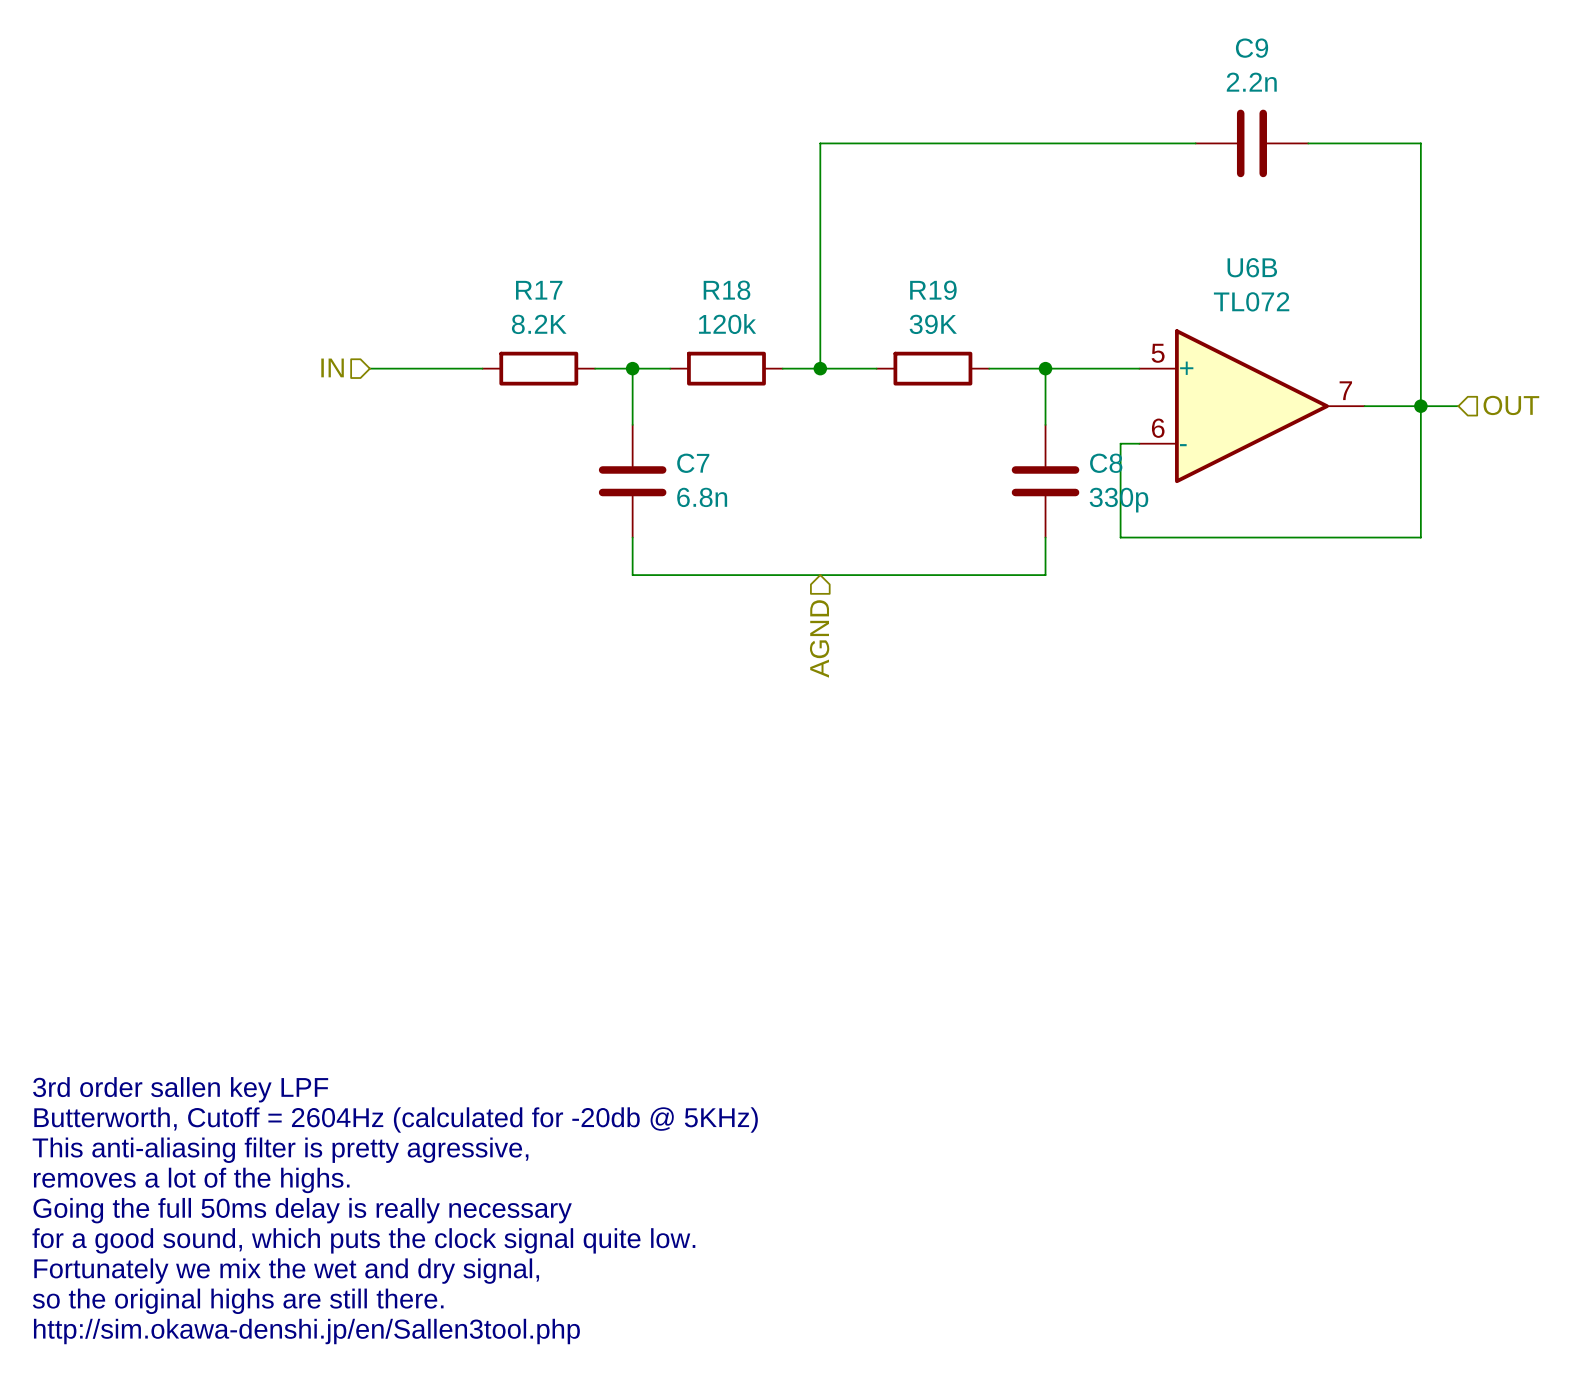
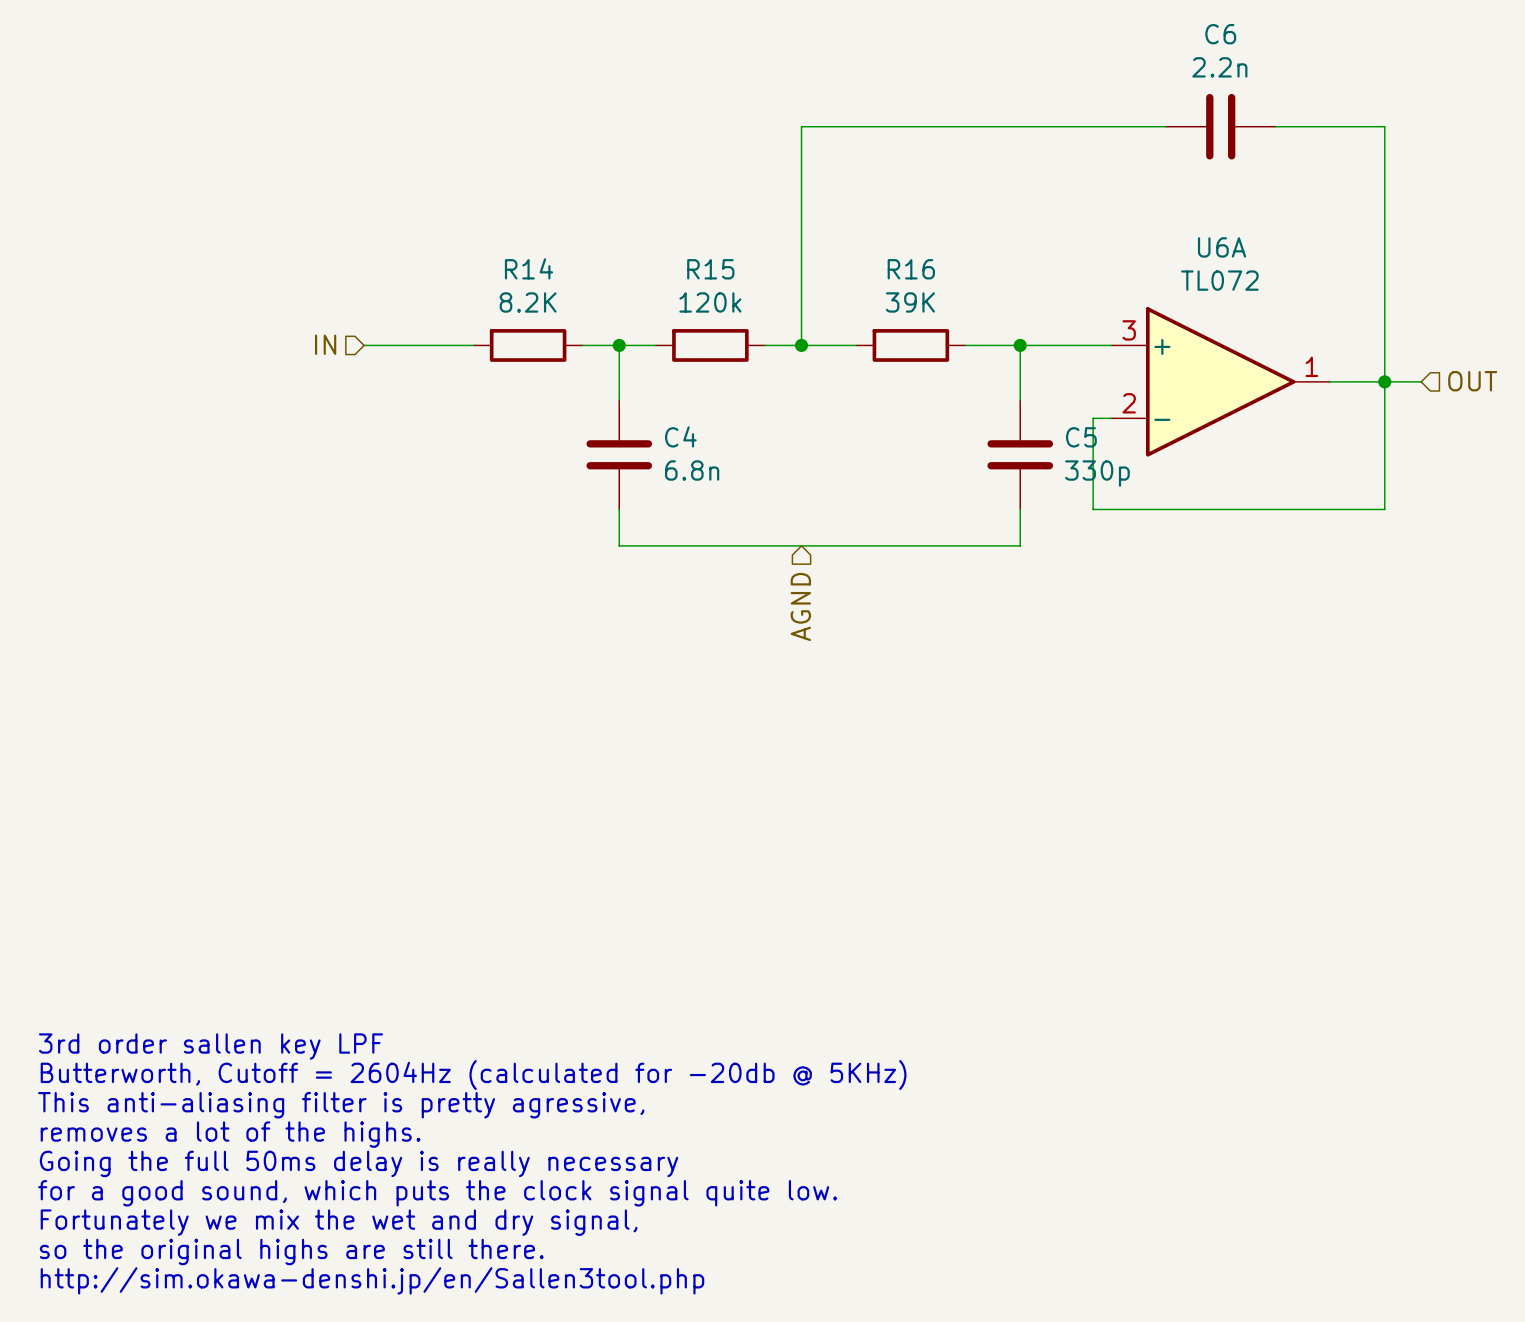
C9 name: C9 (1252, 48) -> C6 (1220, 34)
U6B name: U6B (1252, 267) -> U6A (1222, 247)
R17 name: R17 (539, 290) -> R14 (528, 268)
R18 name: R18 (727, 290) -> R15 (710, 269)
R19 name: R19 (933, 290) -> R16 (911, 269)
U6B pin number: 5 (1158, 353) -> 3 (1129, 330)
U6B pin number: 7 (1345, 390) -> 1 (1311, 366)
U6B pin number: 6 (1158, 428) -> 2 (1129, 403)
C7 name: C7 (693, 463) -> C4 (680, 436)
C8 name: C8 (1106, 463) -> C5 (1081, 437)

